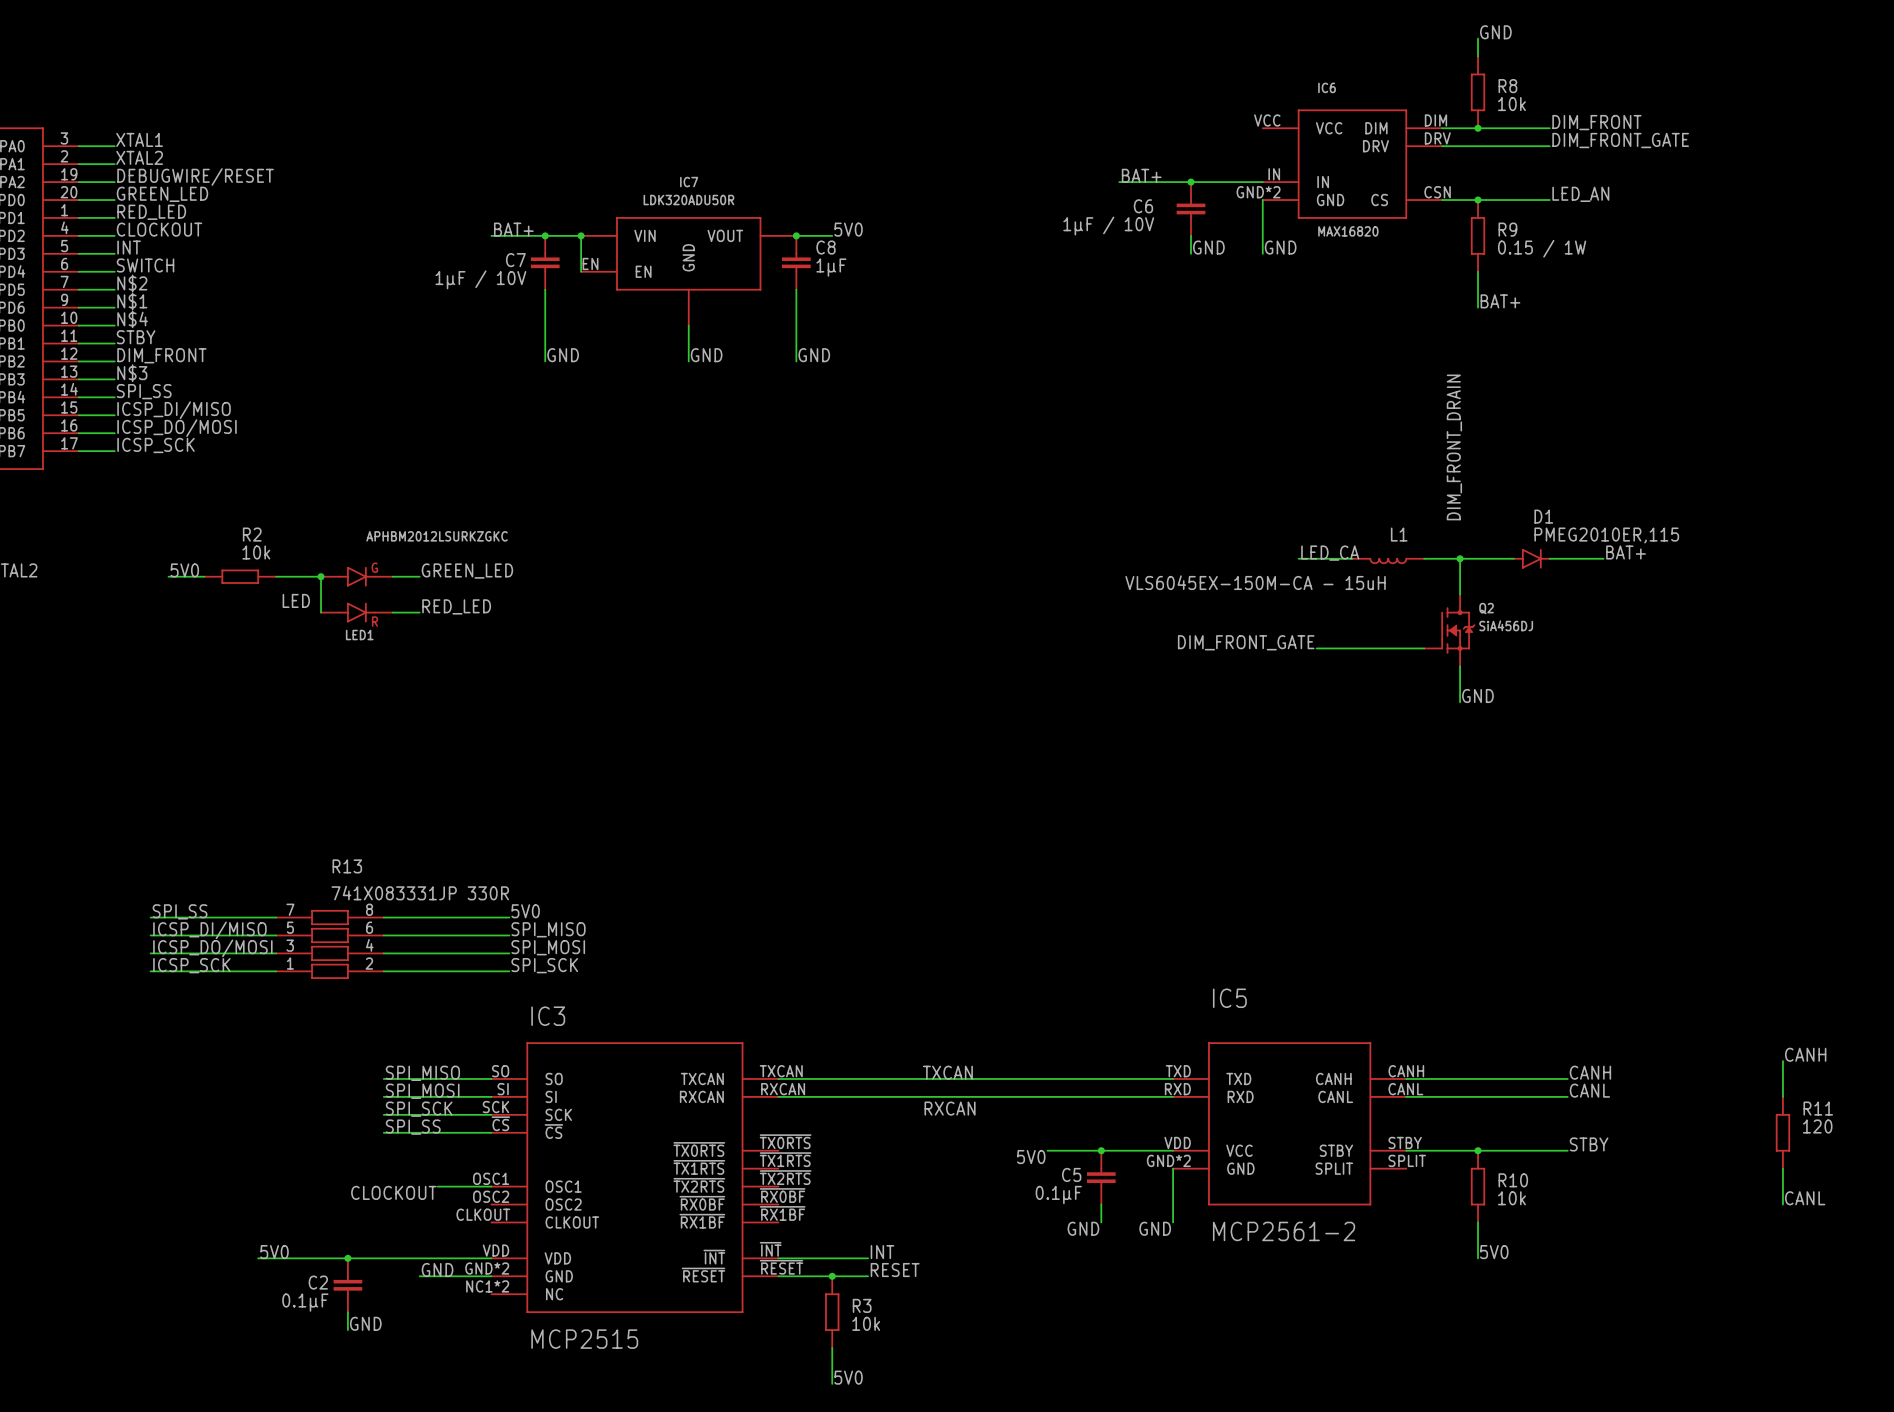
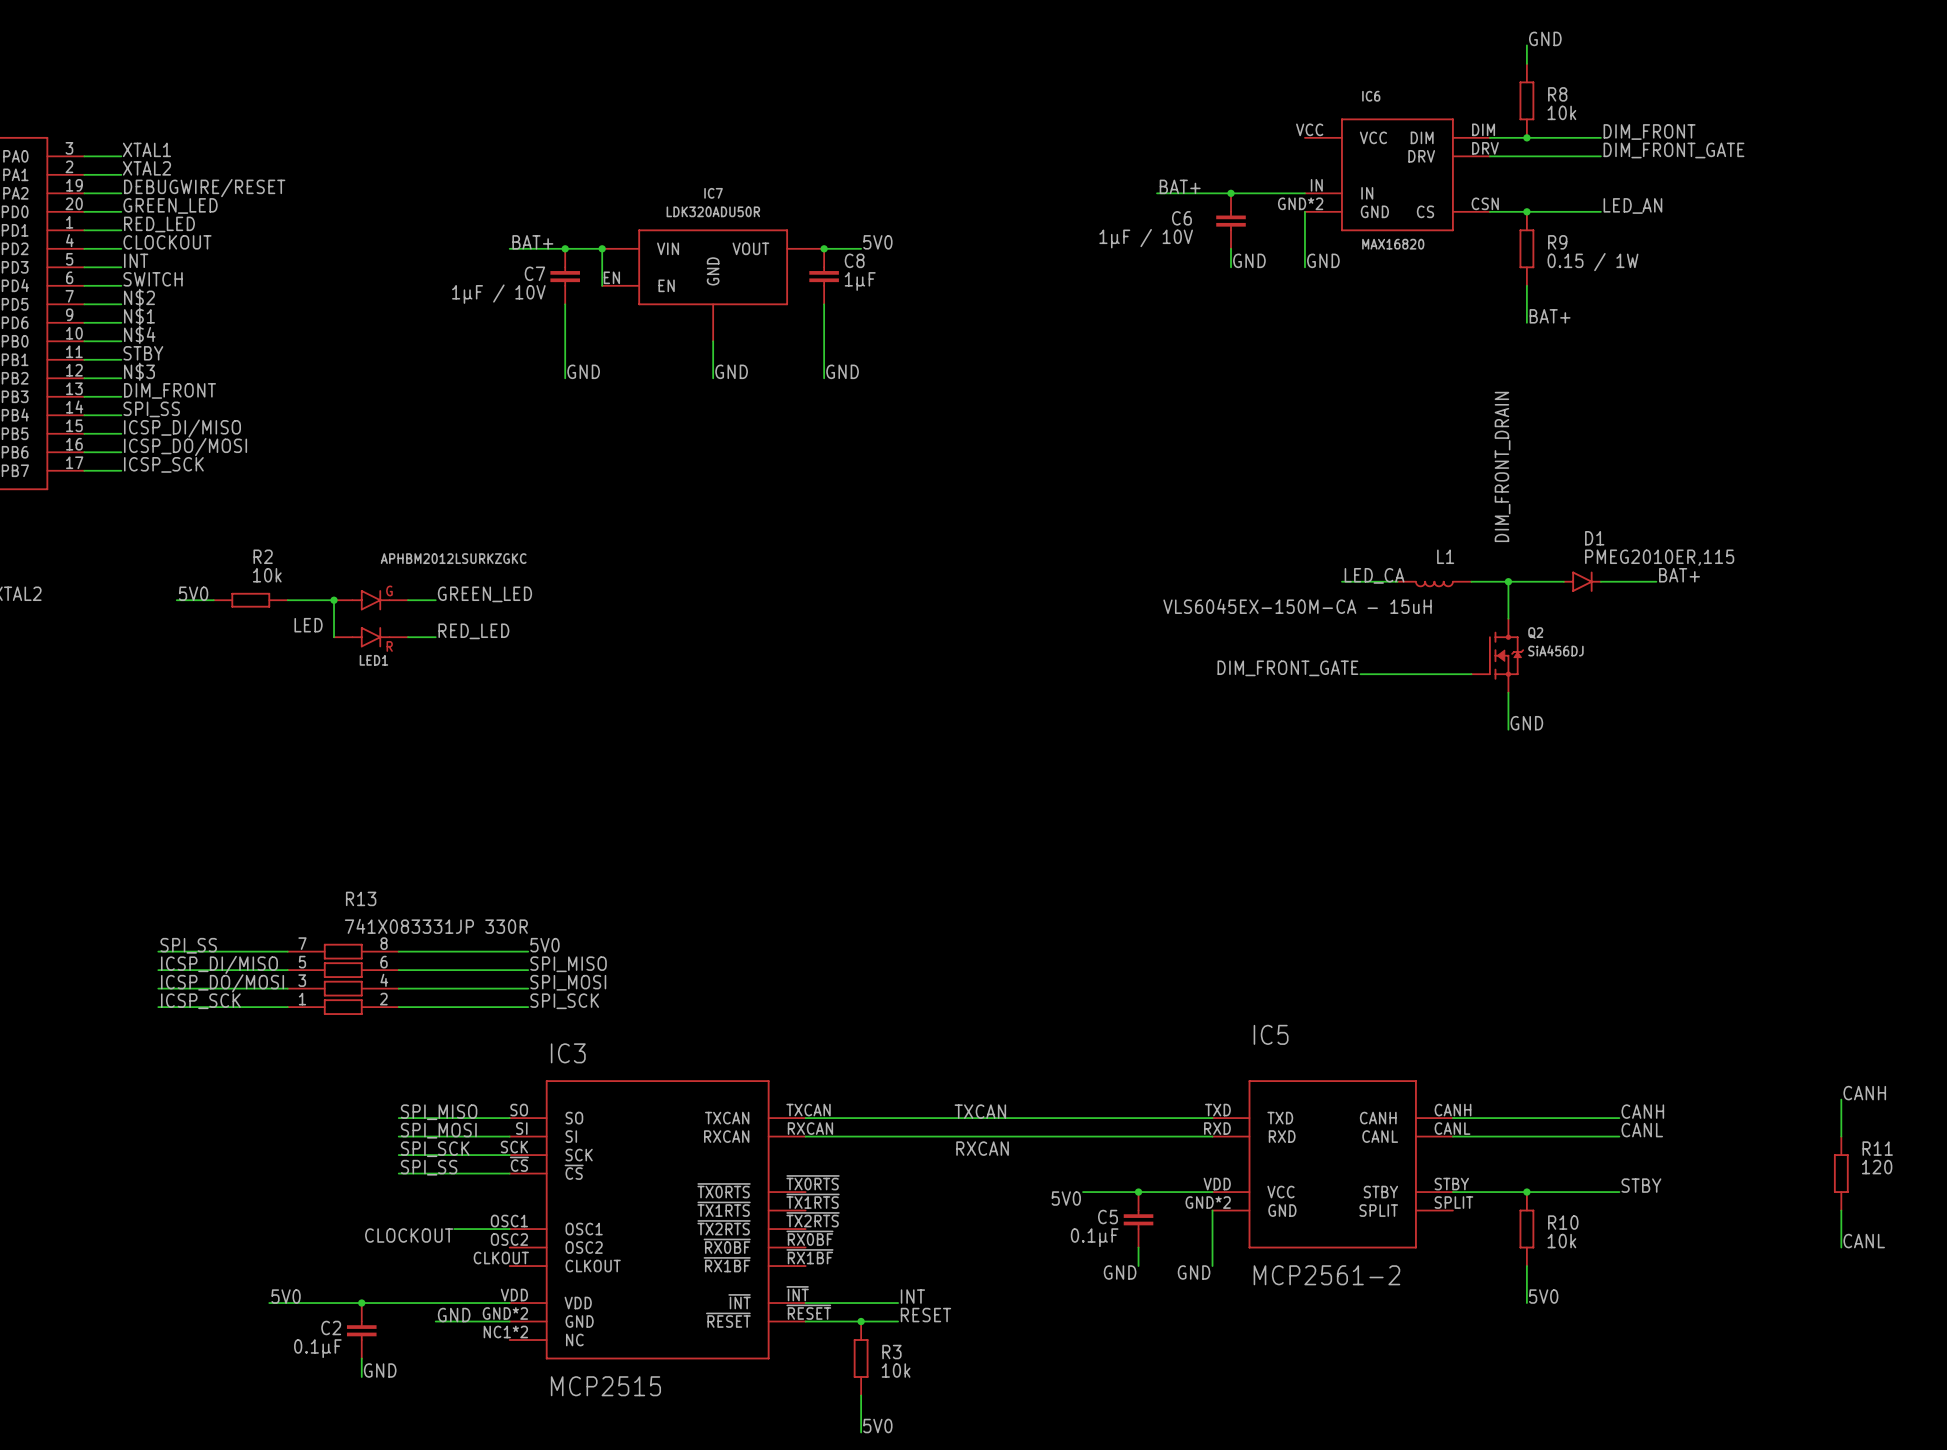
label: DIM_FRONT (161, 355) -> N$3 (139, 371)
label: N$3 (132, 373) -> DIM_FRONT (170, 390)

